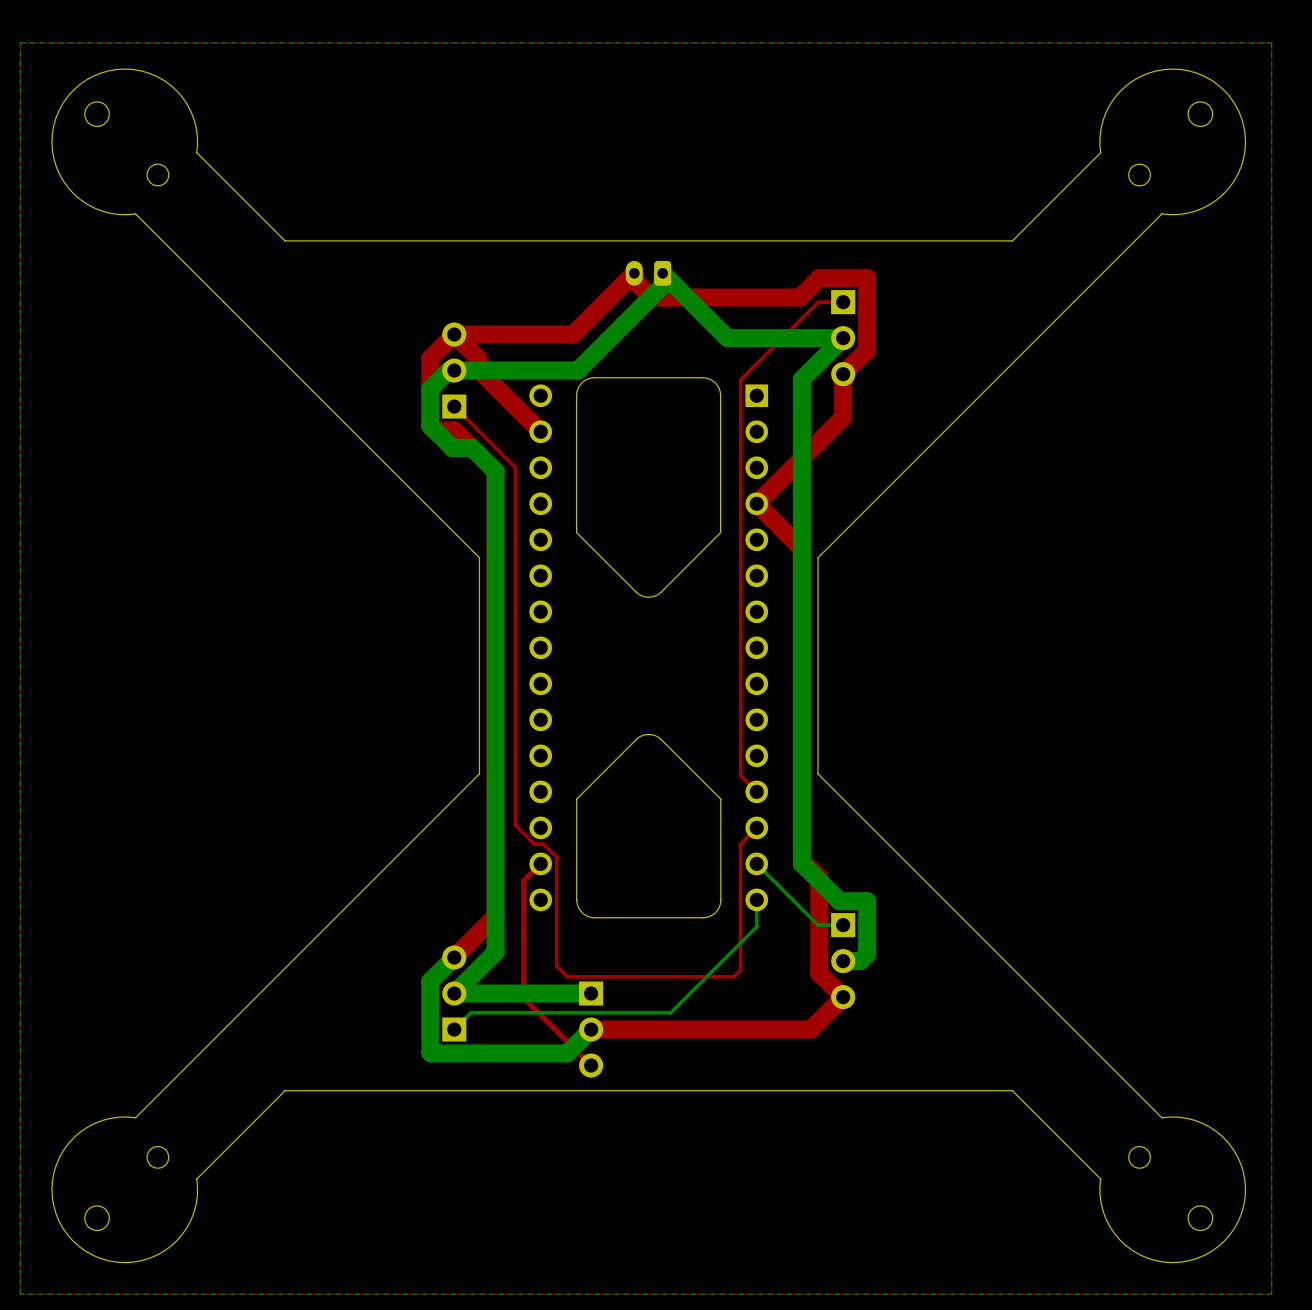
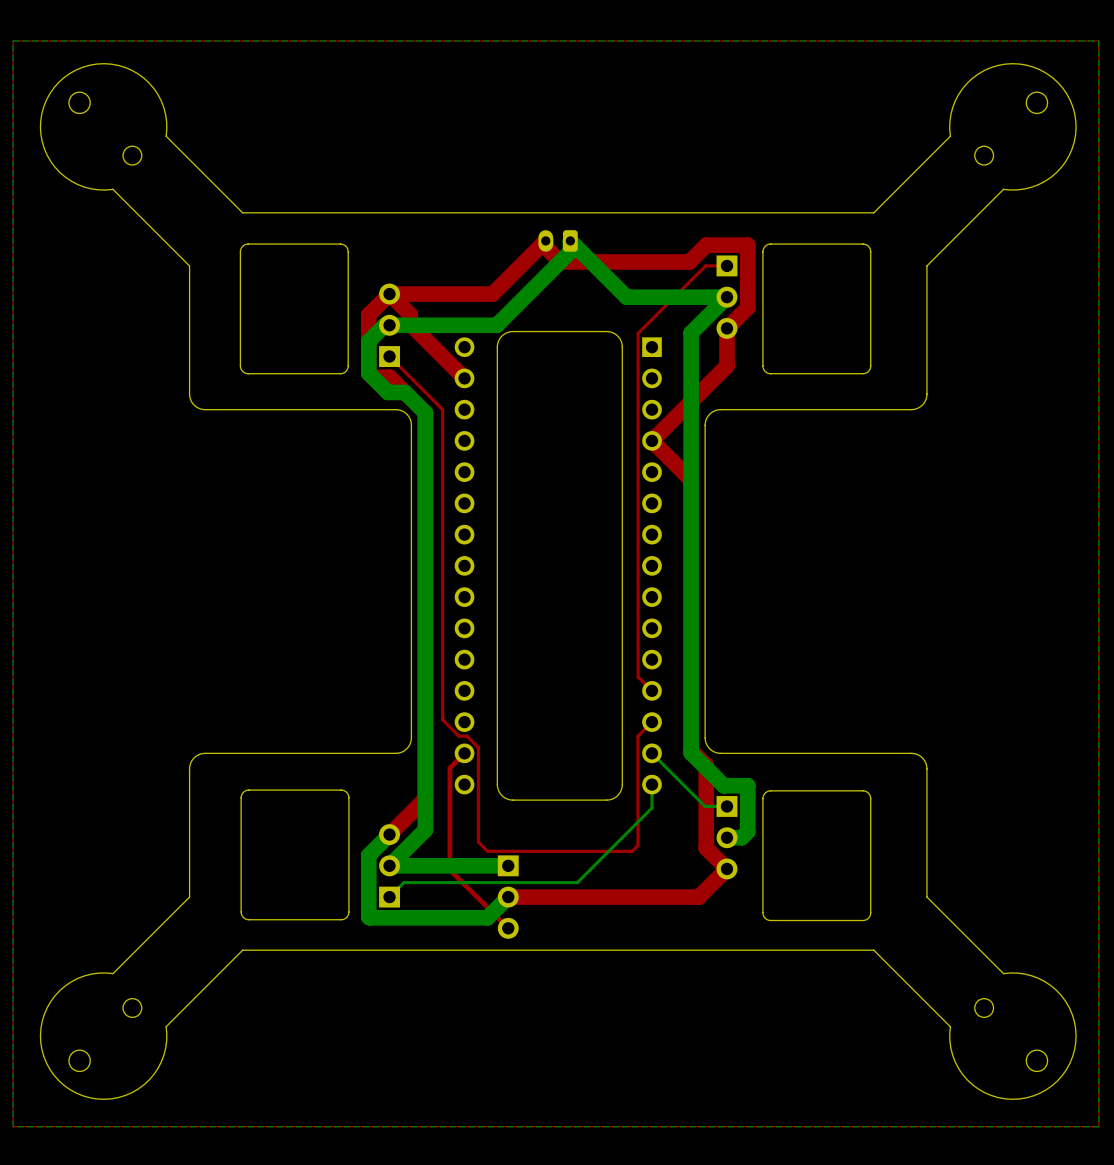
board edge: none -> (340, 244) (248, 244) (242, 246) (240, 251) (240, 365) (243, 372) (248, 373) (340, 373) (346, 370) (348, 365) (348, 251) (345, 246) (340, 244)
board edge: none -> (862, 244) (770, 244) (764, 246) (762, 251) (762, 365) (765, 372) (770, 373) (862, 373) (869, 370) (870, 365) (870, 251) (868, 246) (862, 244)
board edge: (223, 302) (479, 557) -> (189, 265) (189, 394) (194, 405) (205, 409) (400, 410) (408, 415) (411, 423) (411, 487)
board edge: (1073, 302) (817, 557) -> (926, 265) (926, 394) (922, 405) (911, 409) (715, 410) (708, 415) (705, 423) (705, 487)
board edge: (702, 377) (715, 383) (720, 393) (720, 532) (661, 592) (648, 597) (636, 592) (576, 532) (576, 393) (583, 381) (596, 377) -> none
board edge: (479, 773) (223, 1029) -> (411, 675) (411, 739) (408, 747) (400, 752) (205, 753) (194, 757) (189, 768) (189, 897)
board edge: (817, 773) (1073, 1029) -> (705, 675) (705, 739) (708, 747) (715, 752) (911, 753) (922, 757) (926, 768) (926, 897)
board edge: (576, 899) (582, 912) (588, 916) (596, 917) -> (512, 331) (501, 336) (497, 347) (497, 784) (501, 795) (512, 800)
board edge: (576, 899) (576, 799) (637, 738) (651, 734) (661, 739) (720, 799) (720, 902) (715, 912) (702, 917) -> (605, 331) (617, 336) (622, 347) (622, 784) (617, 795) (605, 800)
board edge: none -> (341, 790) (248, 790) (242, 793) (241, 797) (241, 911) (244, 918) (248, 919) (341, 919) (347, 916) (348, 911) (348, 797) (346, 792) (341, 790)
board edge: none -> (862, 790) (770, 790) (764, 793) (762, 798) (762, 912) (765, 918) (770, 920) (862, 920) (869, 917) (870, 912) (870, 798) (868, 793) (862, 790)

